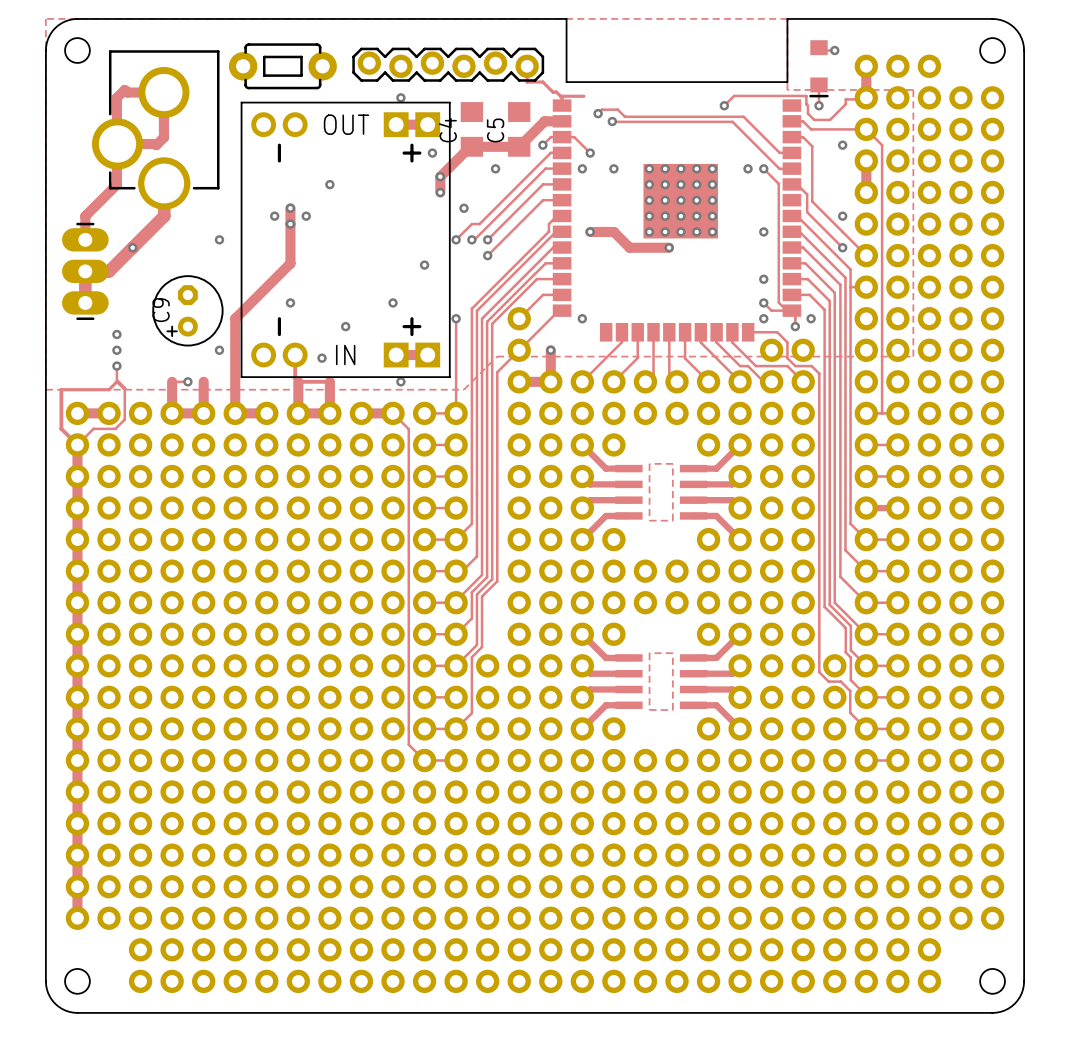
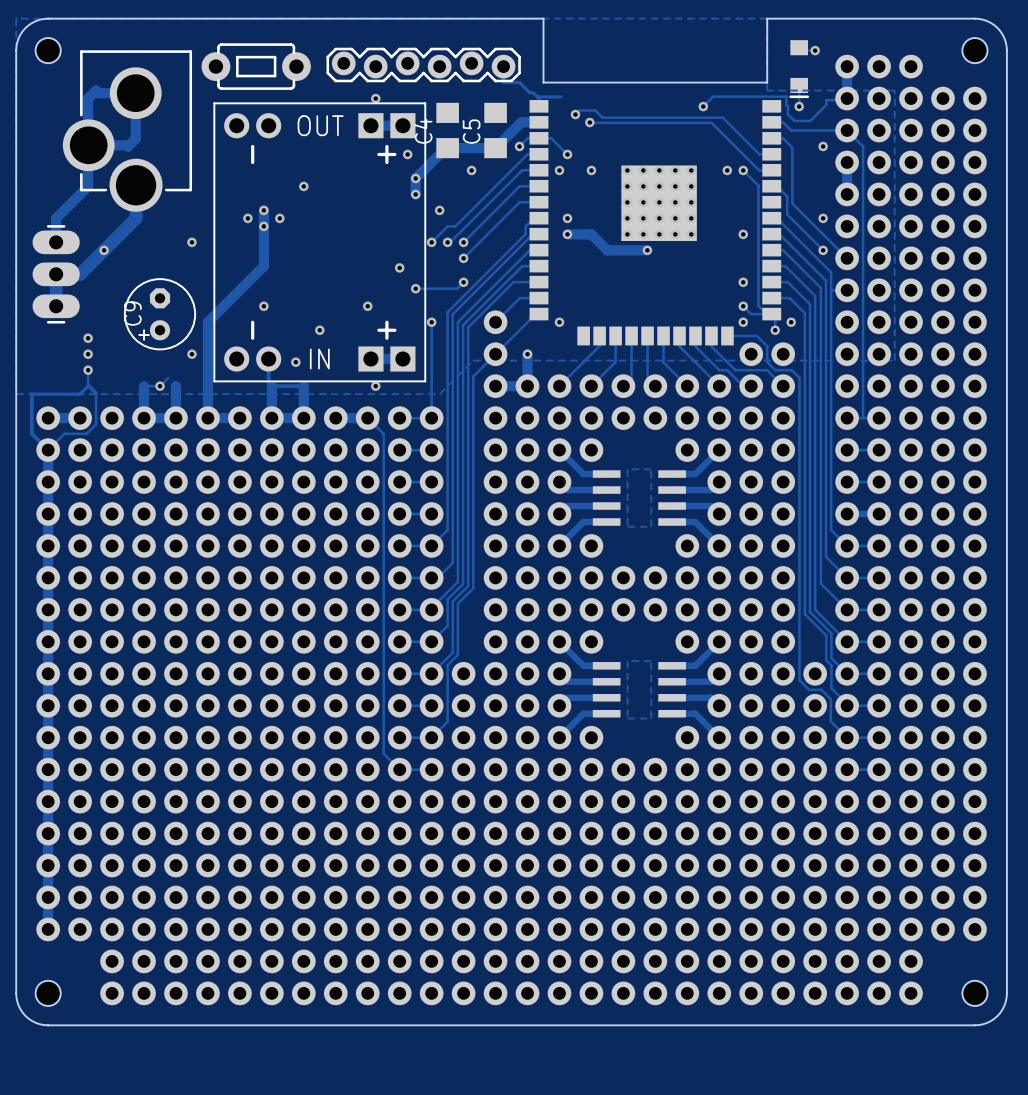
via: none -> (567, 218)
track: none -> (463, 282) (457, 288) (415, 288)
via: none -> (463, 282)
via: none -> (415, 288)
track: none -> (168, 378) (160, 386)

